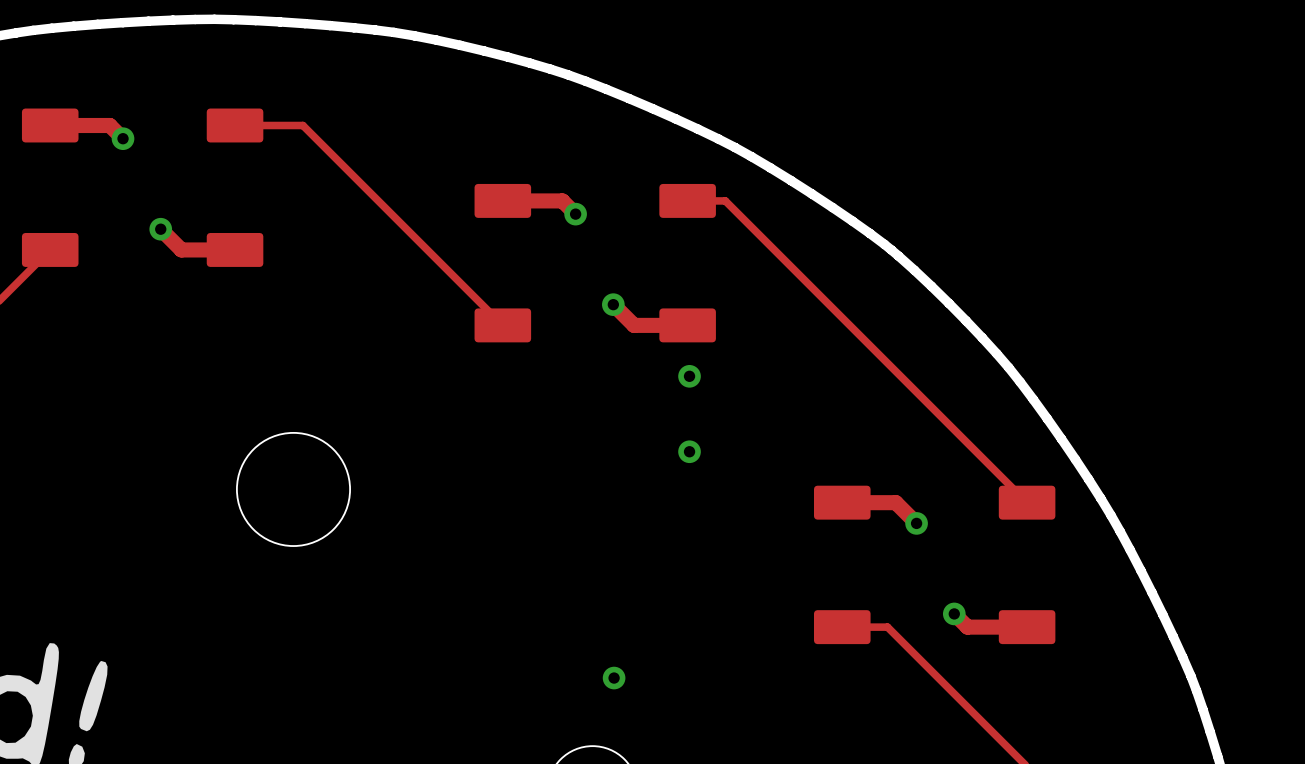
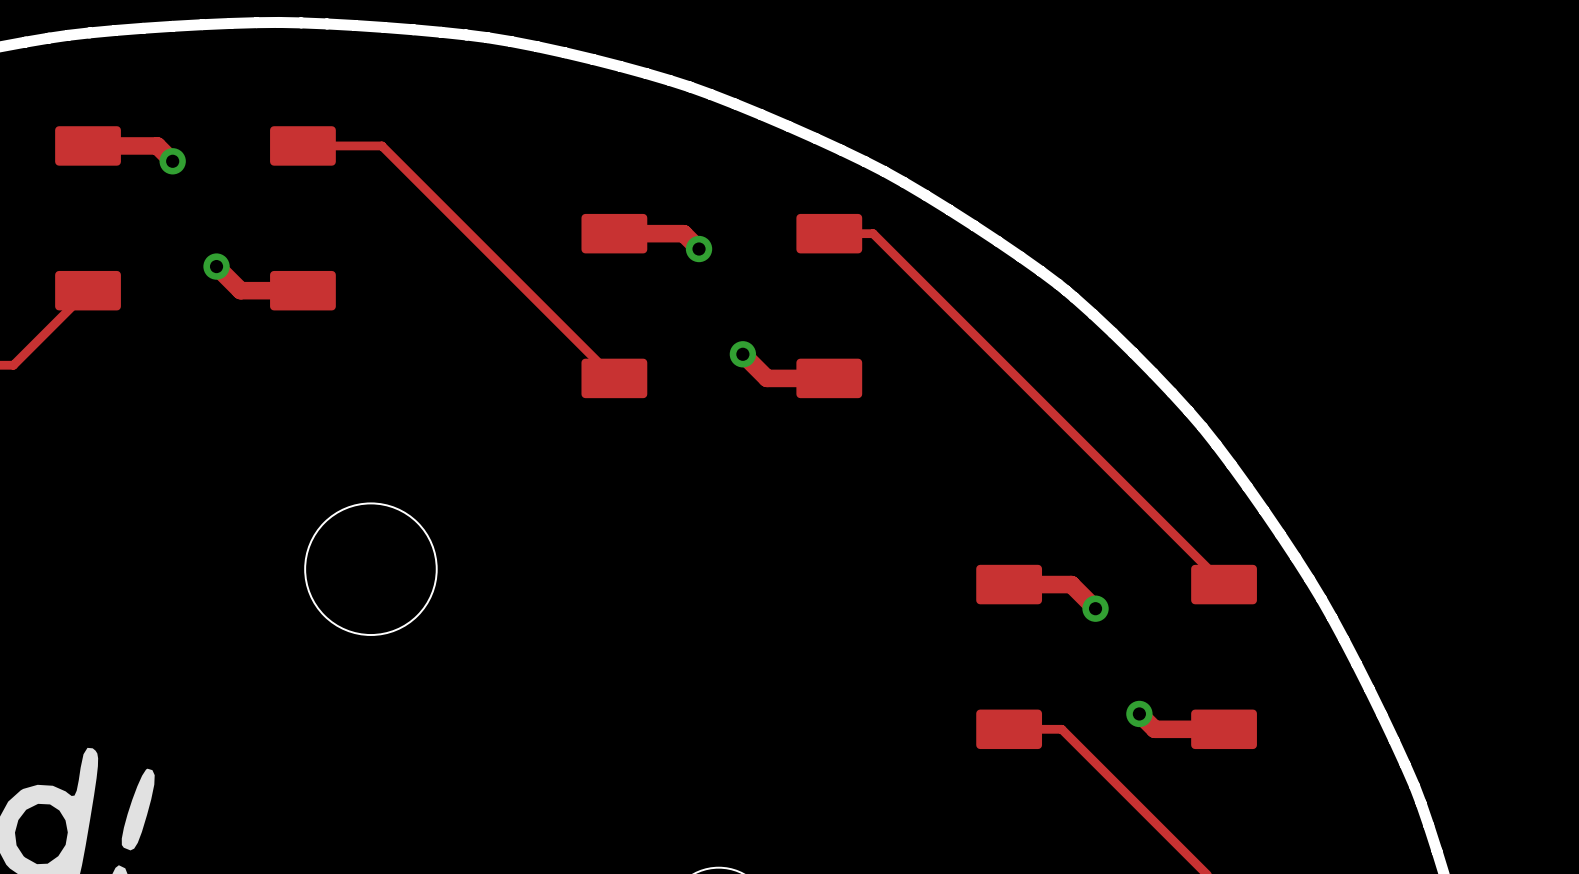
via: (689, 376) -> none
via: (689, 451) -> none
via: (614, 678) -> none

